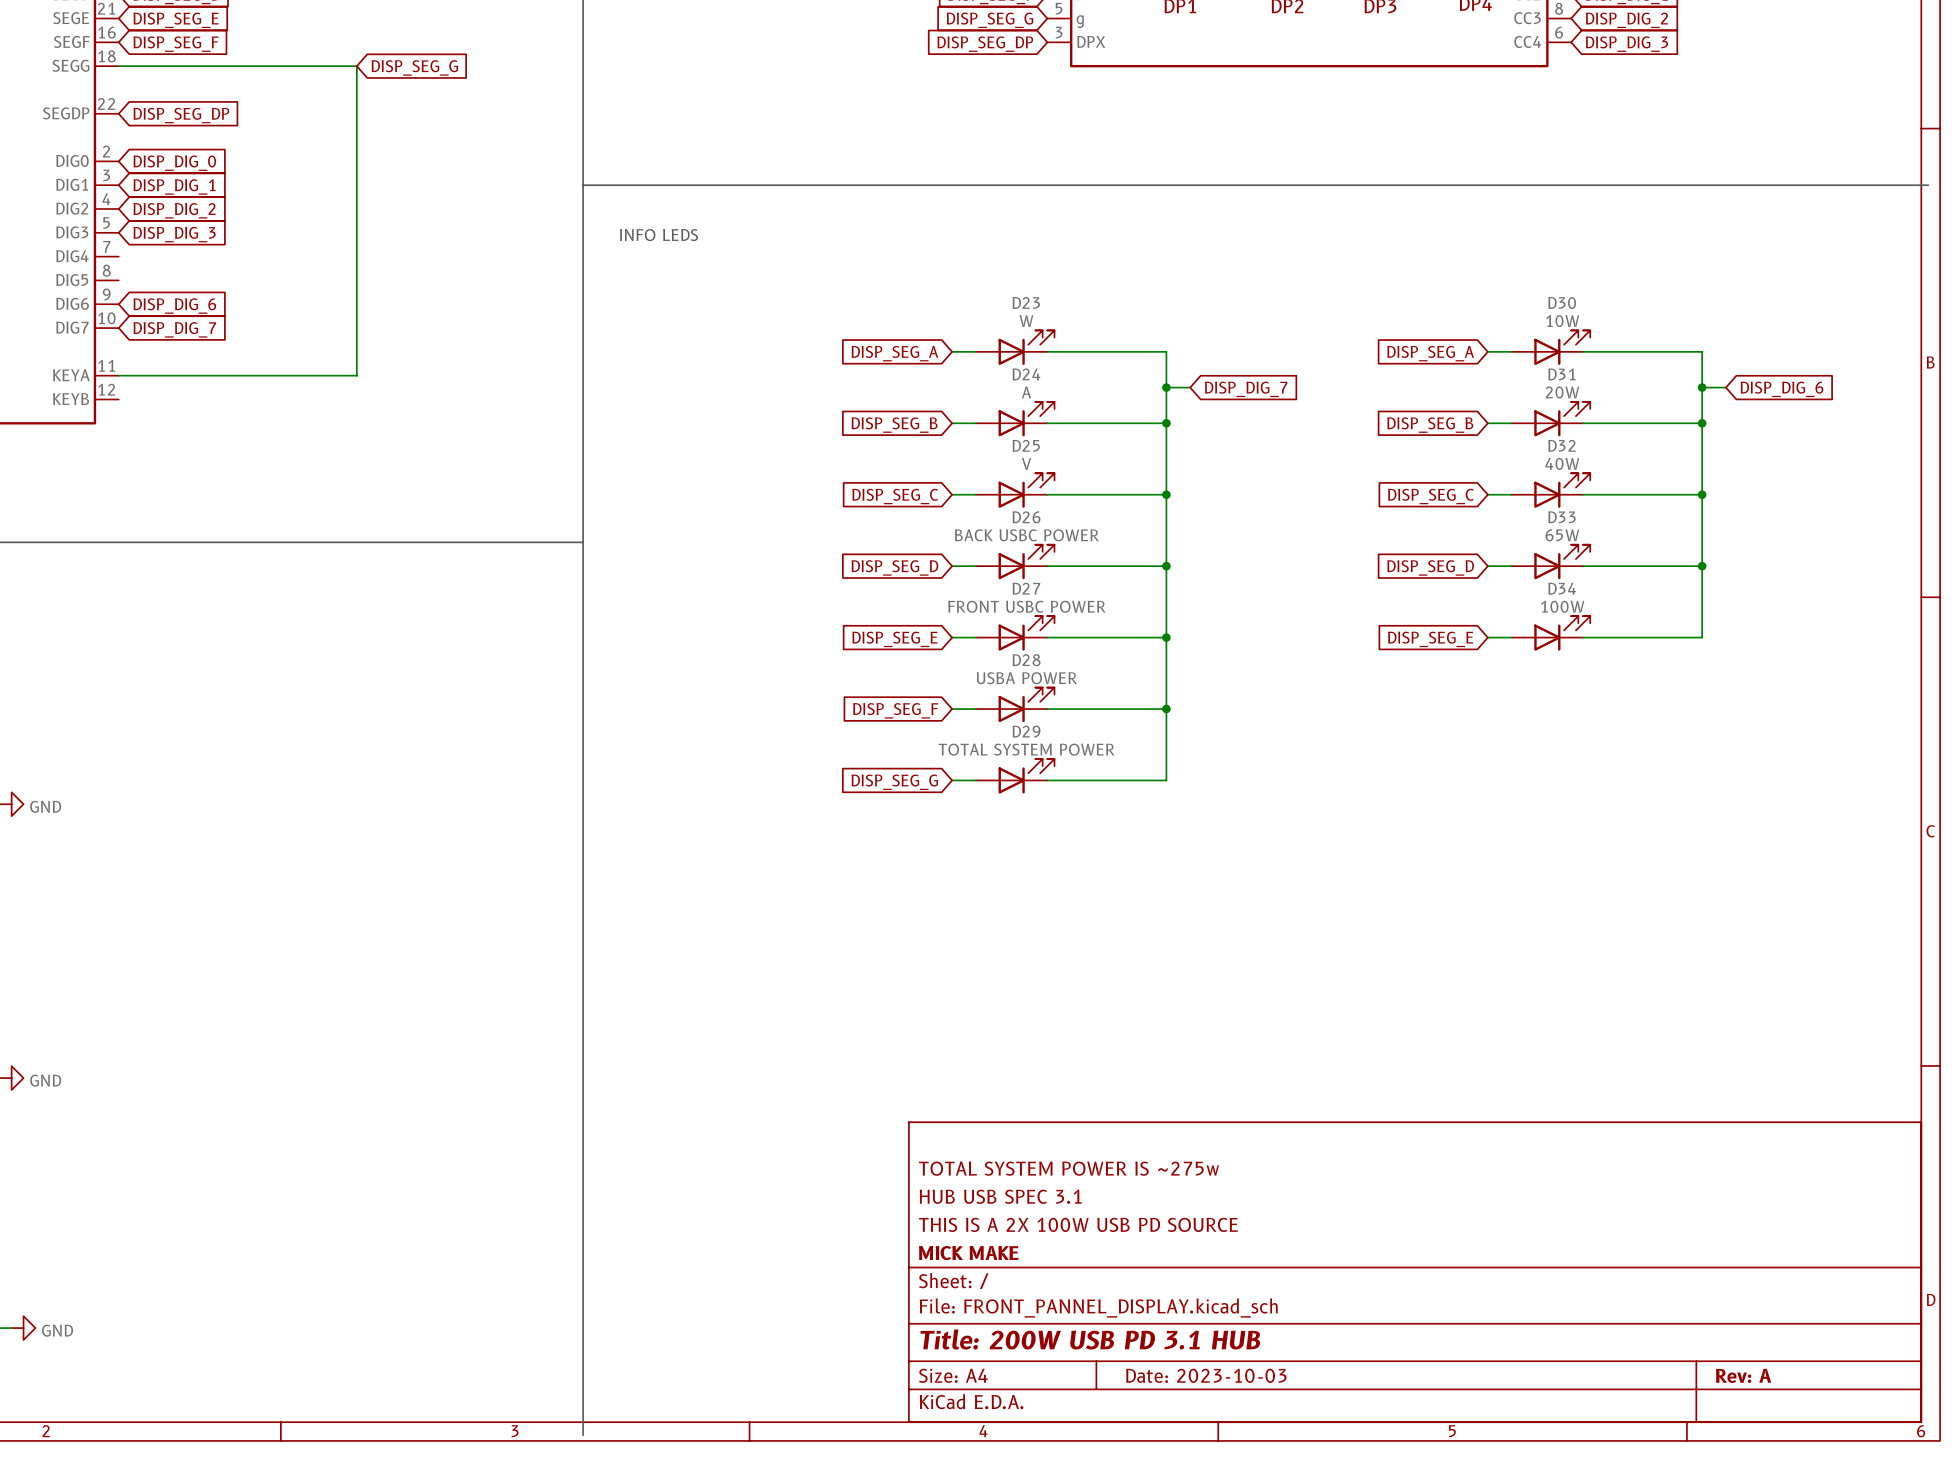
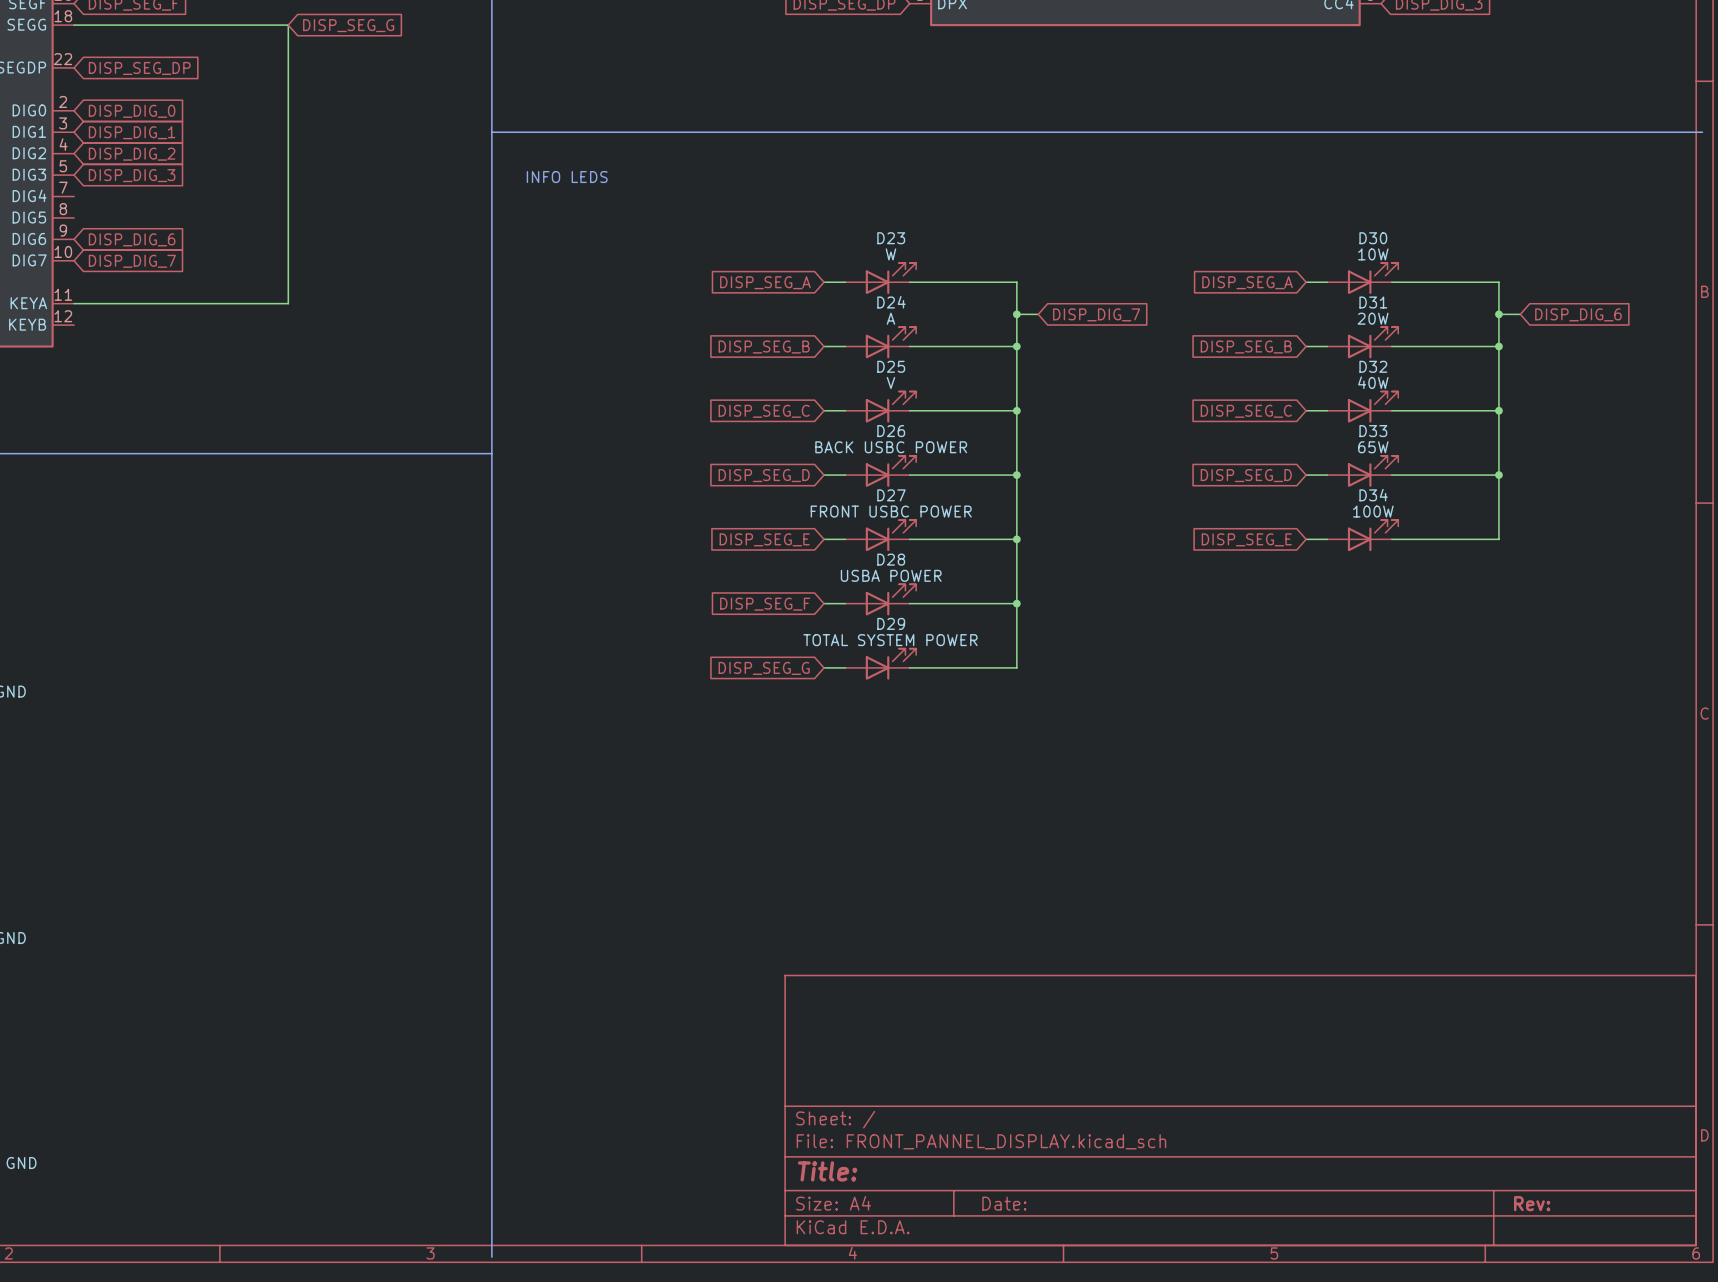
title block: TOTAL SYSTEM POWER IS ~275w (1069, 1168) -> none
title block: HUB USB SPEC 3.1 (1000, 1196) -> none
title block: THIS IS A 2X 100W USB PD SOURCE (1078, 1224) -> none
title block: MICK MAKE (968, 1253) -> none
title block: Title: 200W USB PD 3.1 HUB (1090, 1339) -> Title: (827, 1171)
title block: Date: 2023-10-03 (1206, 1375) -> Date: (1004, 1203)
title block: Rev: A (1743, 1375) -> Rev: (1532, 1203)

